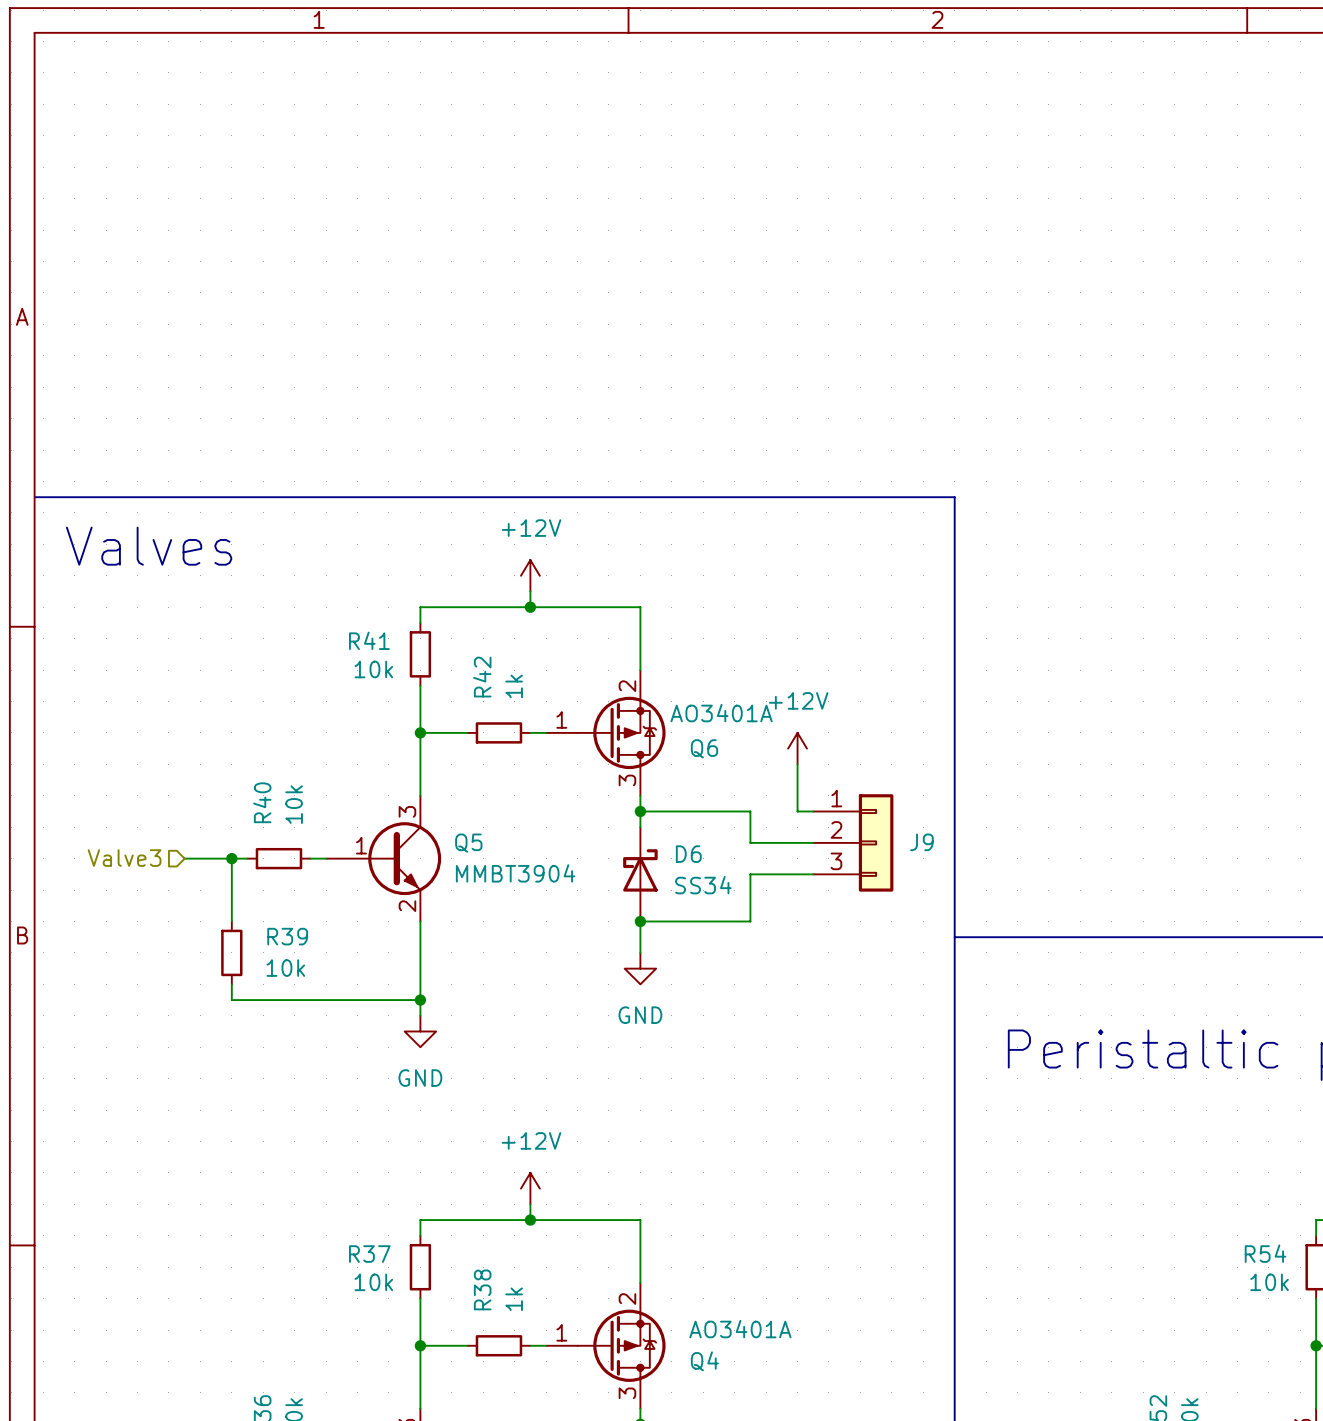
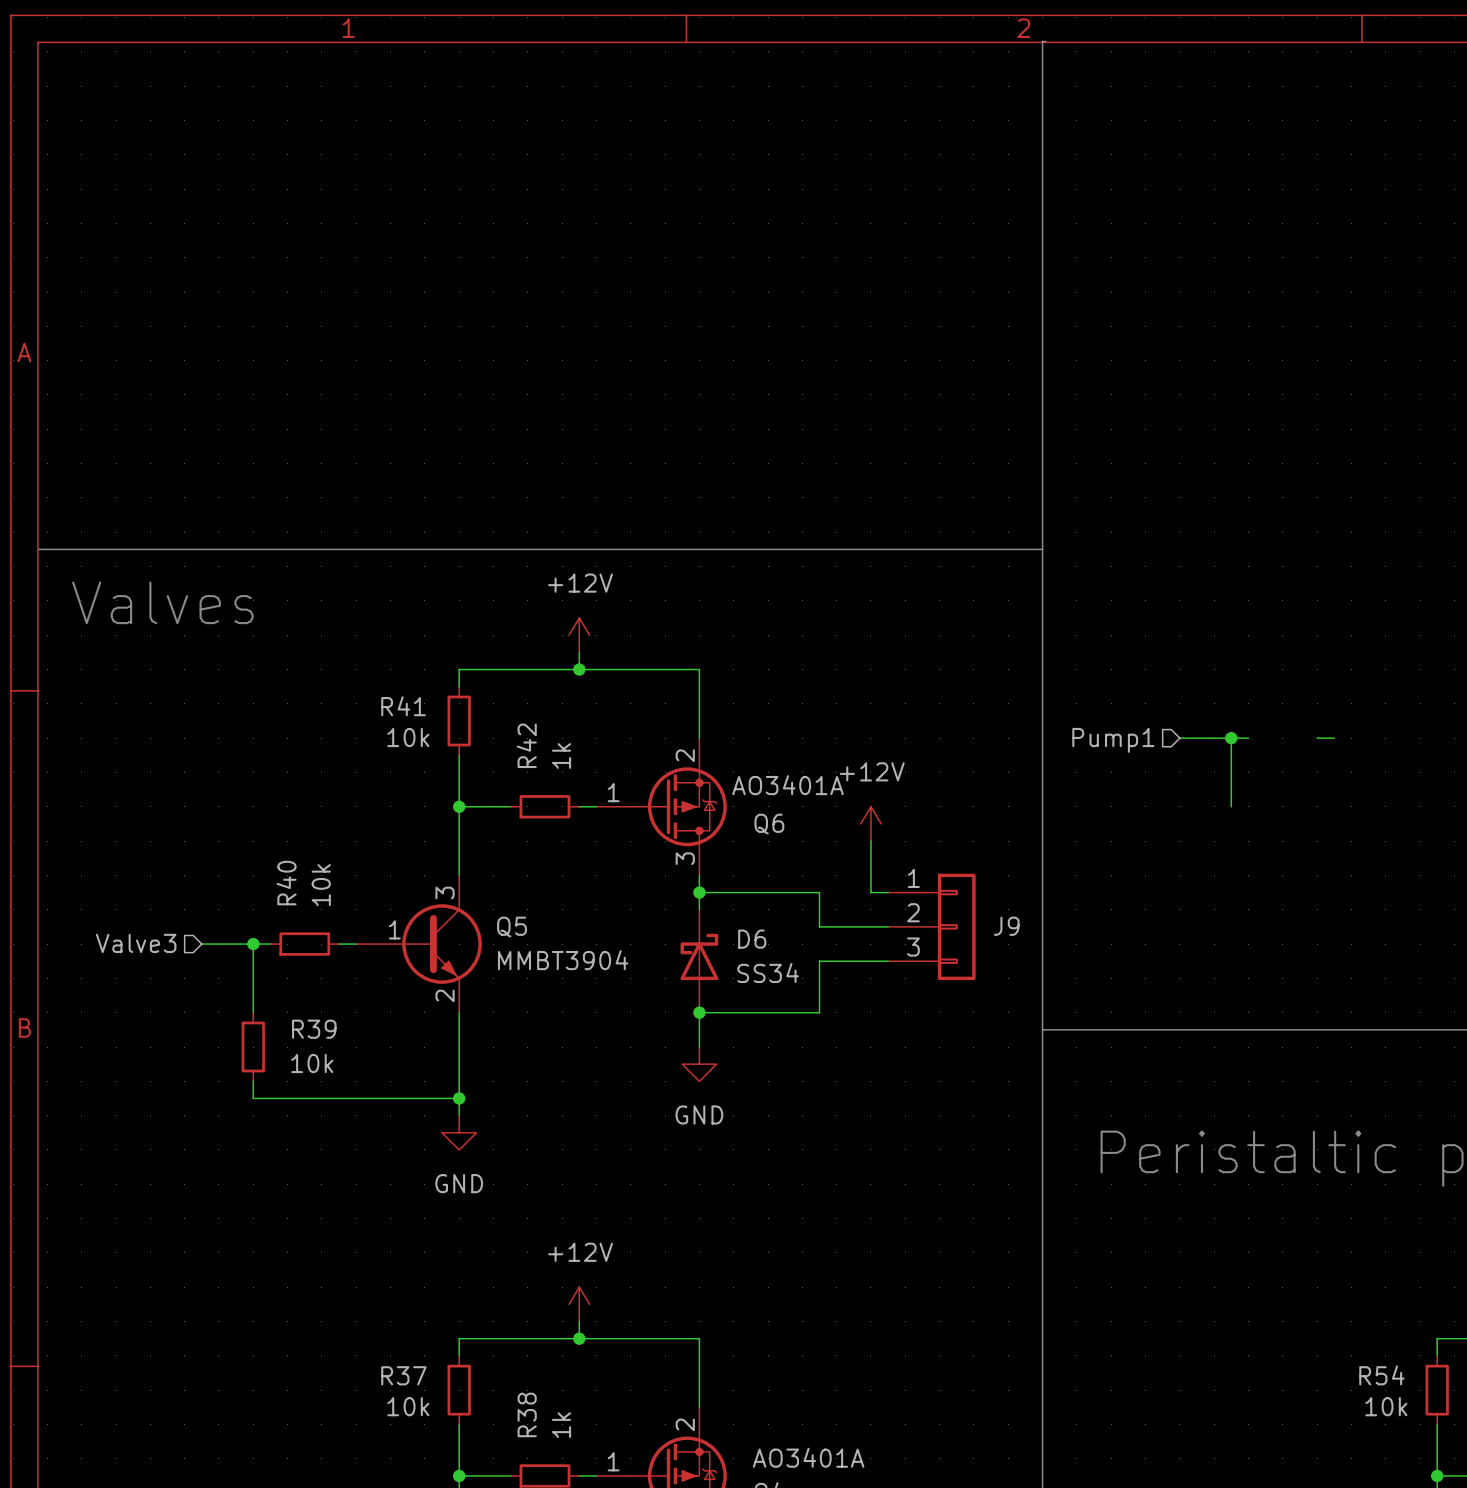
line: none -> (1045, 41) (1042, 41) (1042, 549)
wire: none -> (1179, 738) (1248, 738)
wire: none -> (1231, 738) (1231, 806)
junction: none -> (1231, 738)
wire: none -> (1317, 738) (1334, 738)
hierarchical label: none -> Pump1 (1113, 740)

